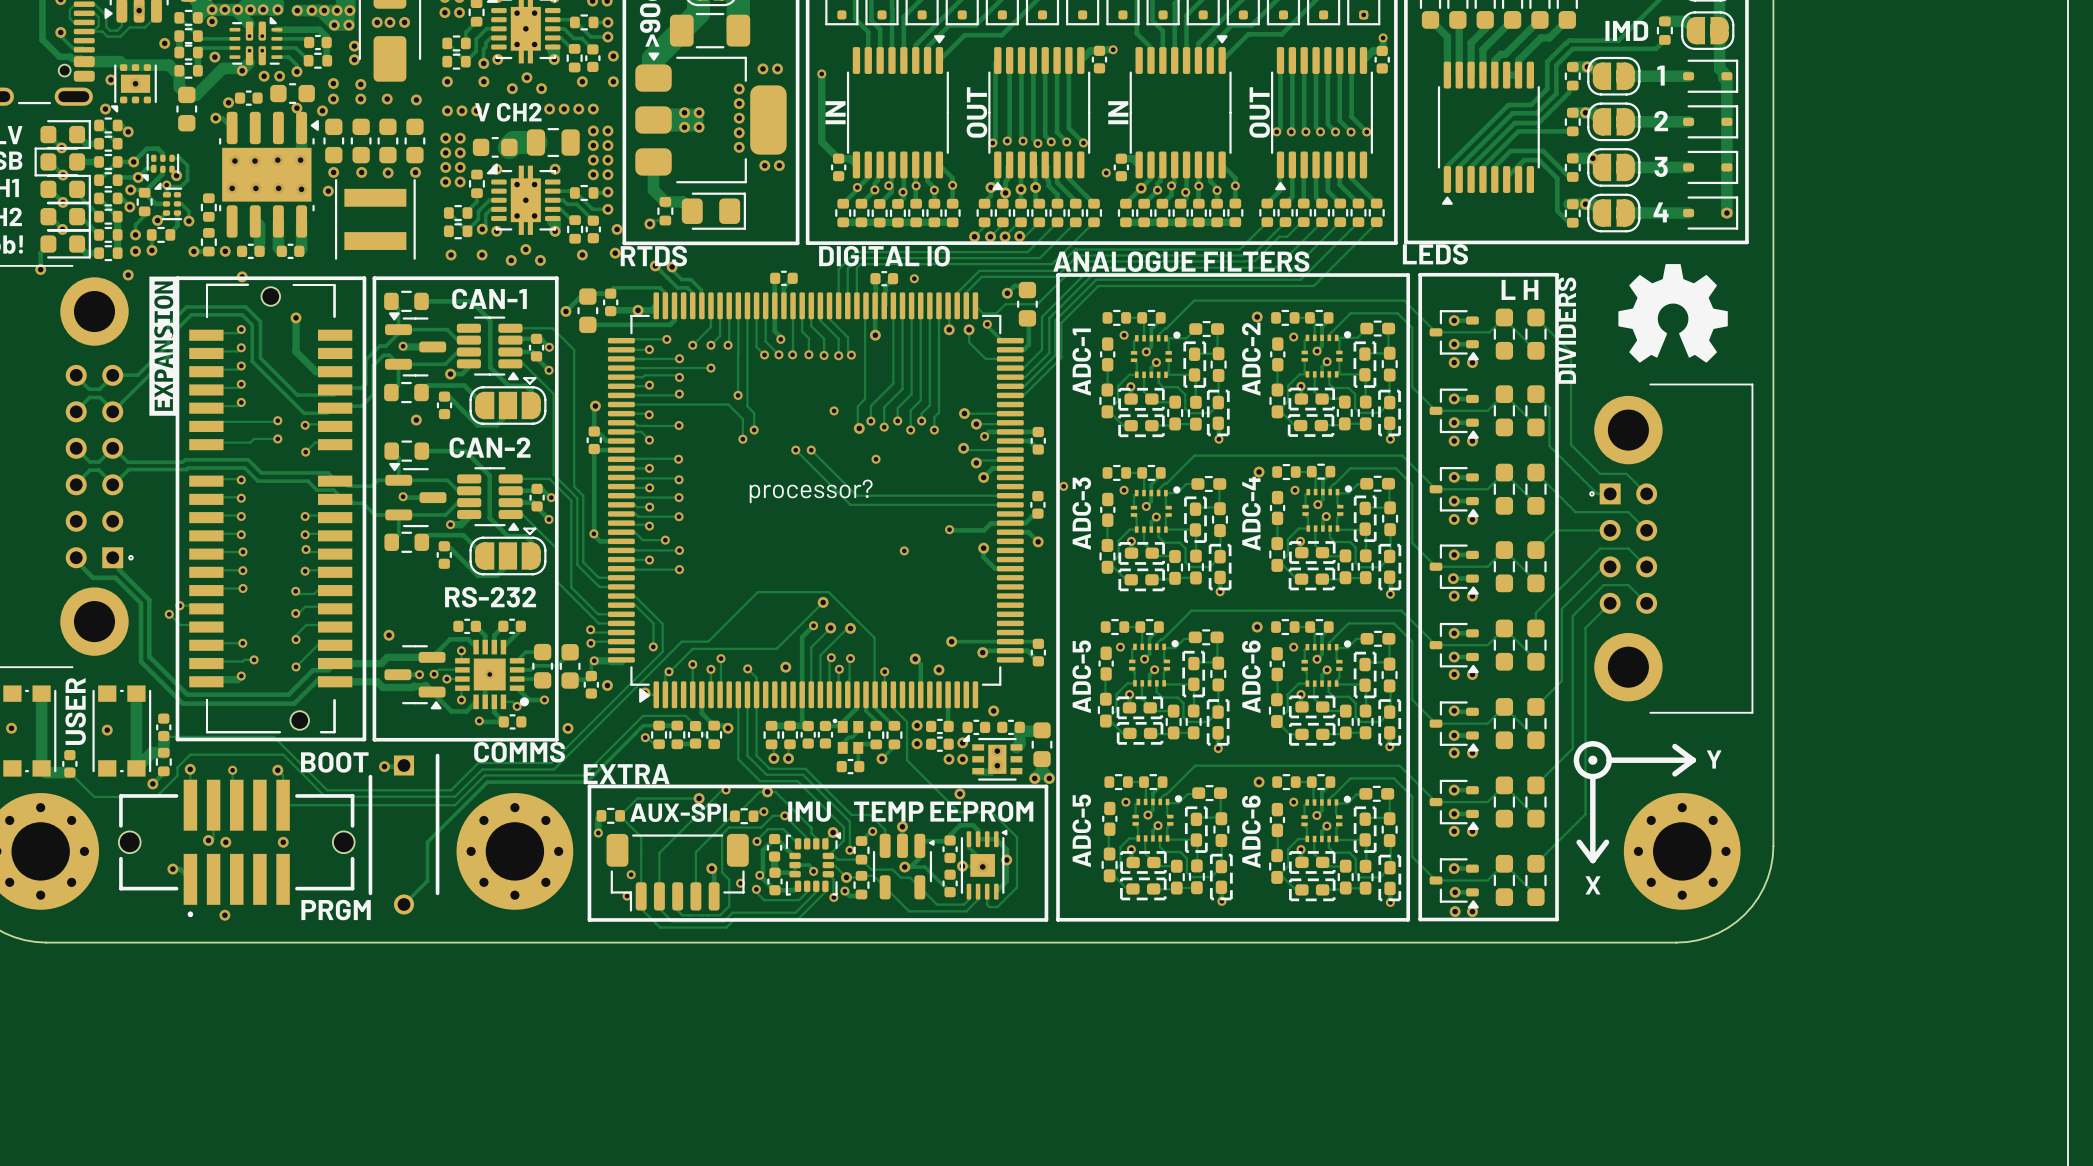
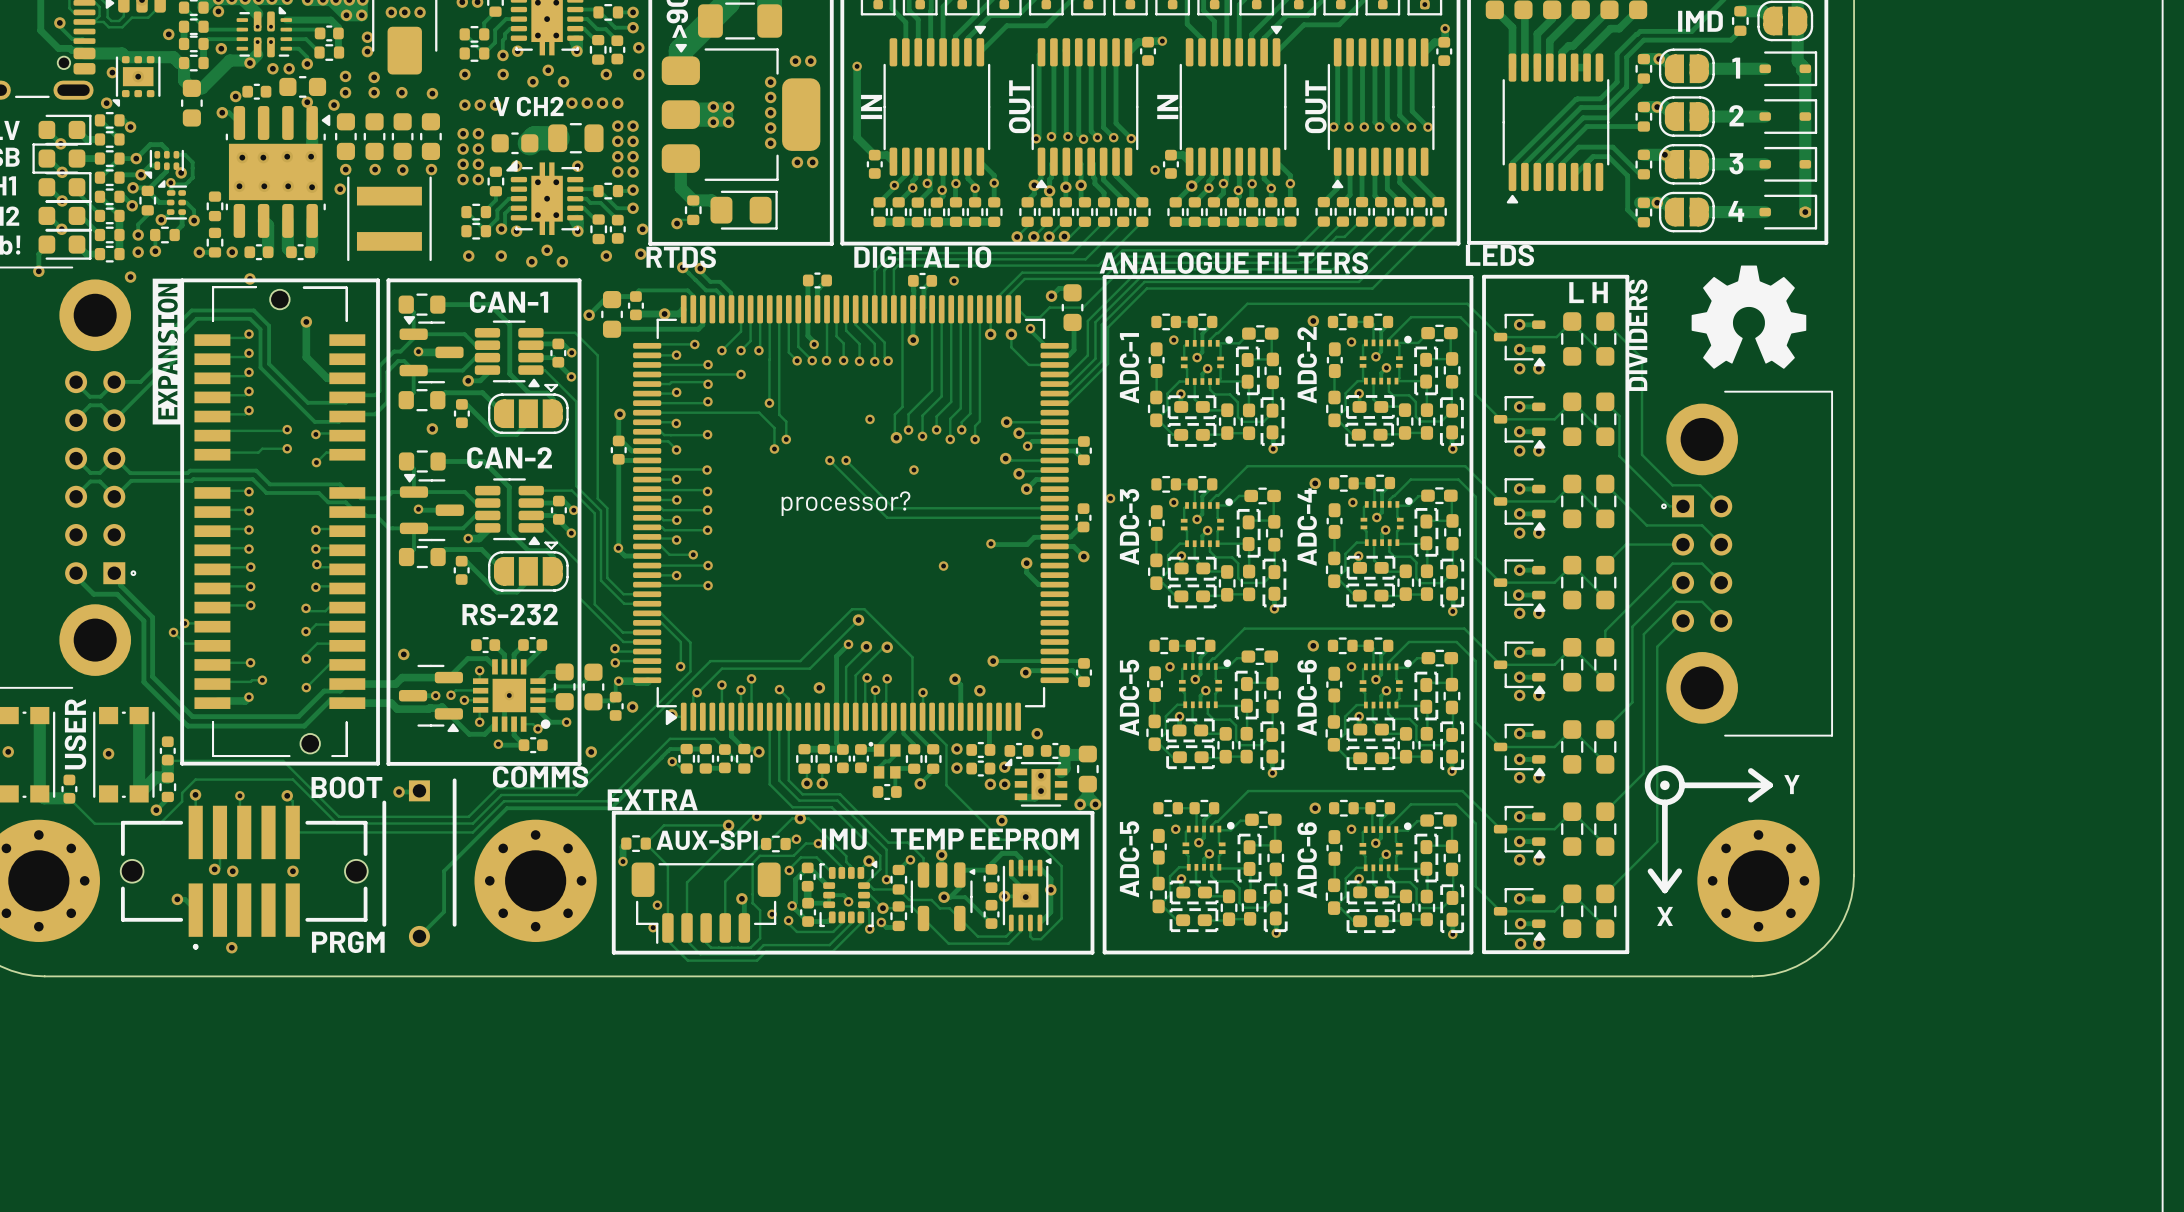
track: (817, 592) (757, 592) (708, 641) -> (852, 609) (800, 661) (738, 661)

